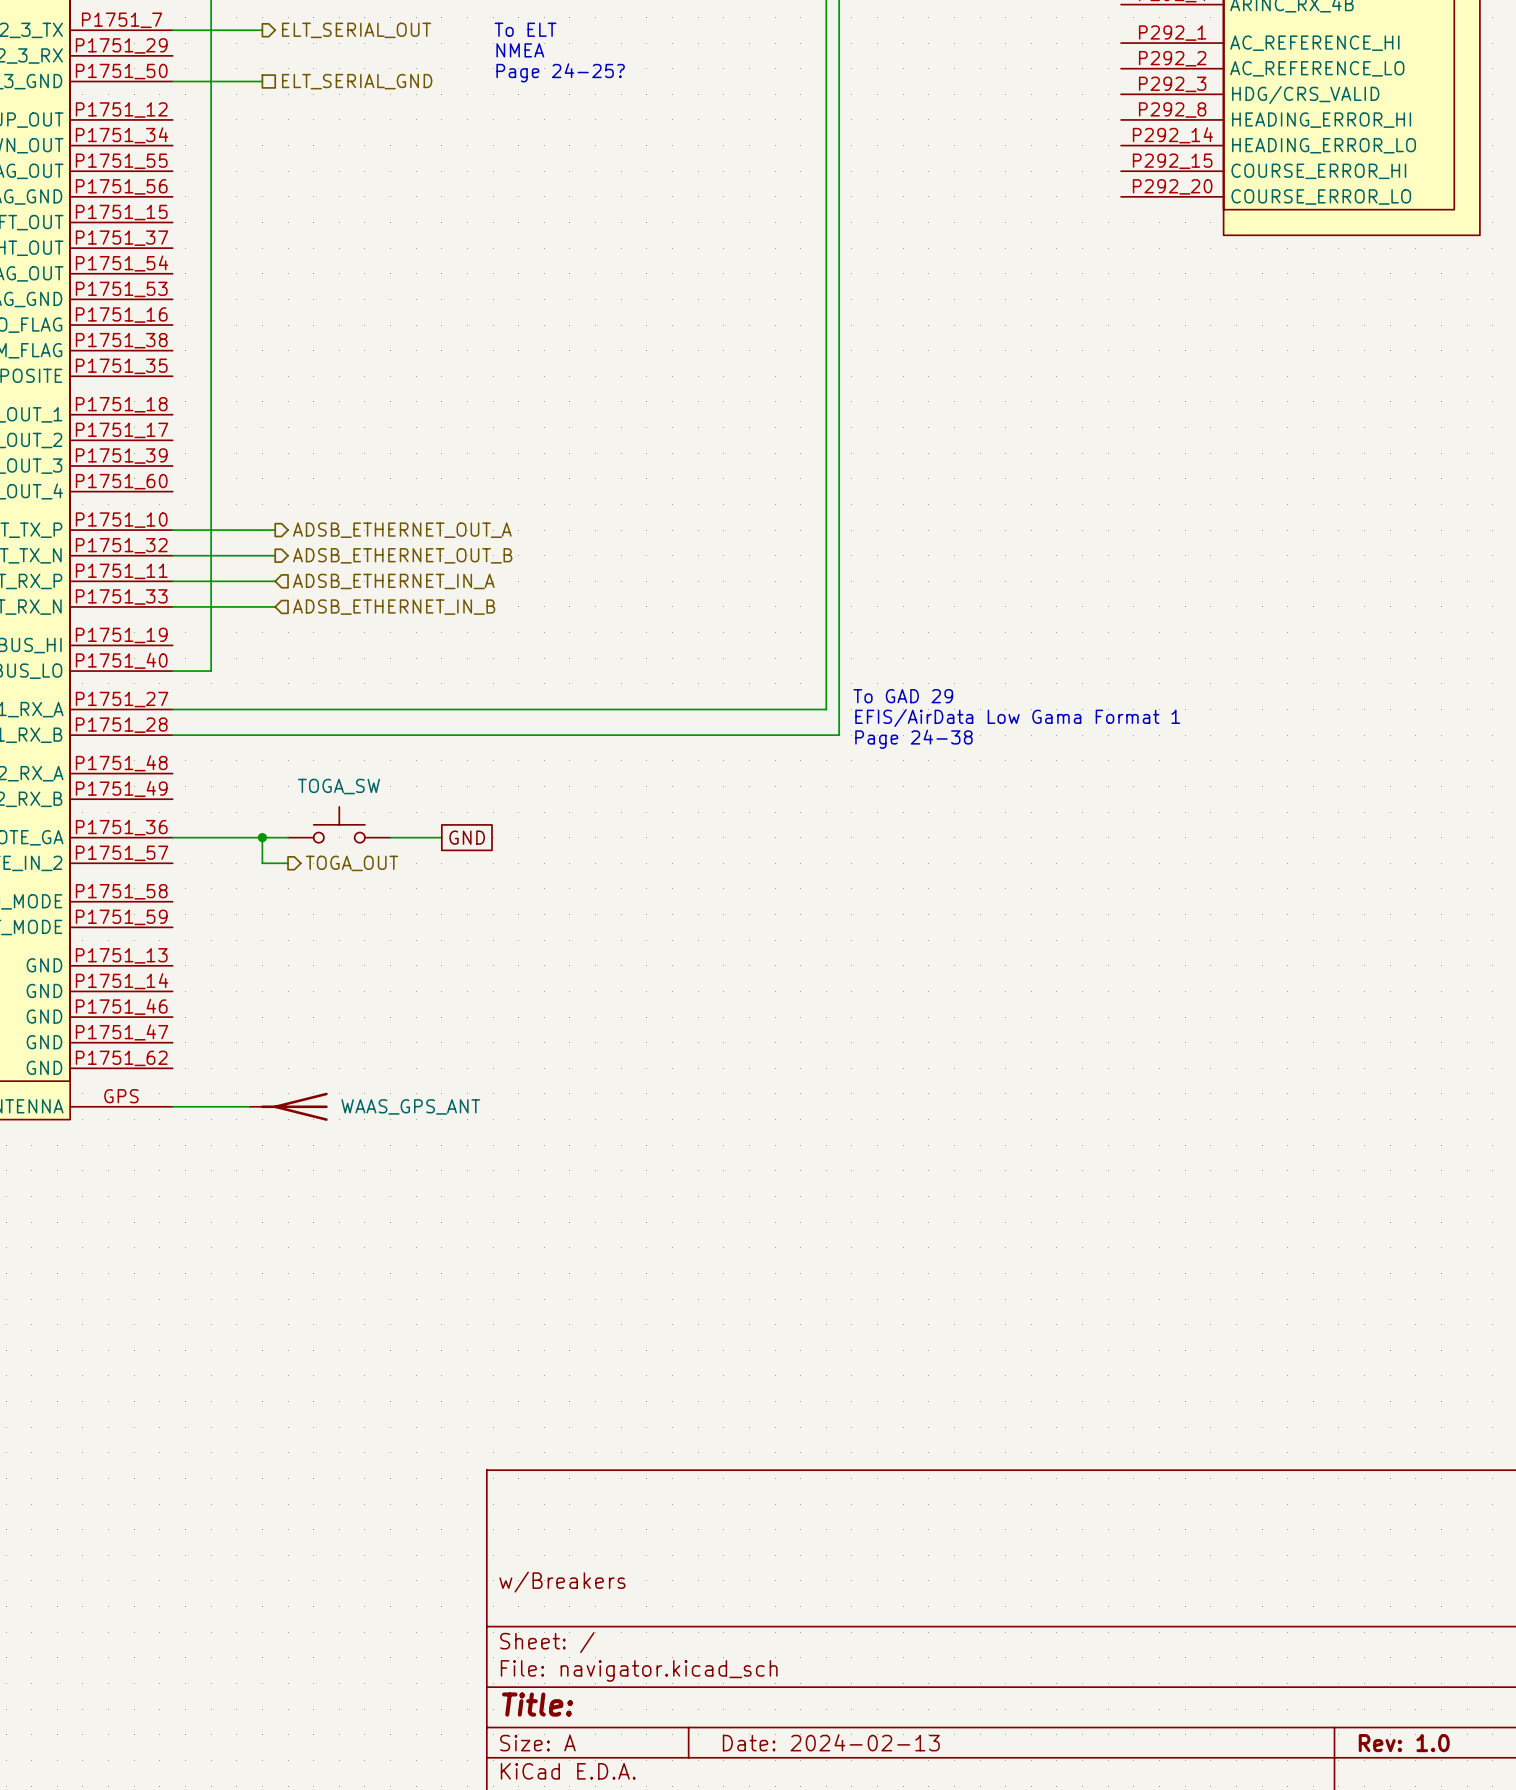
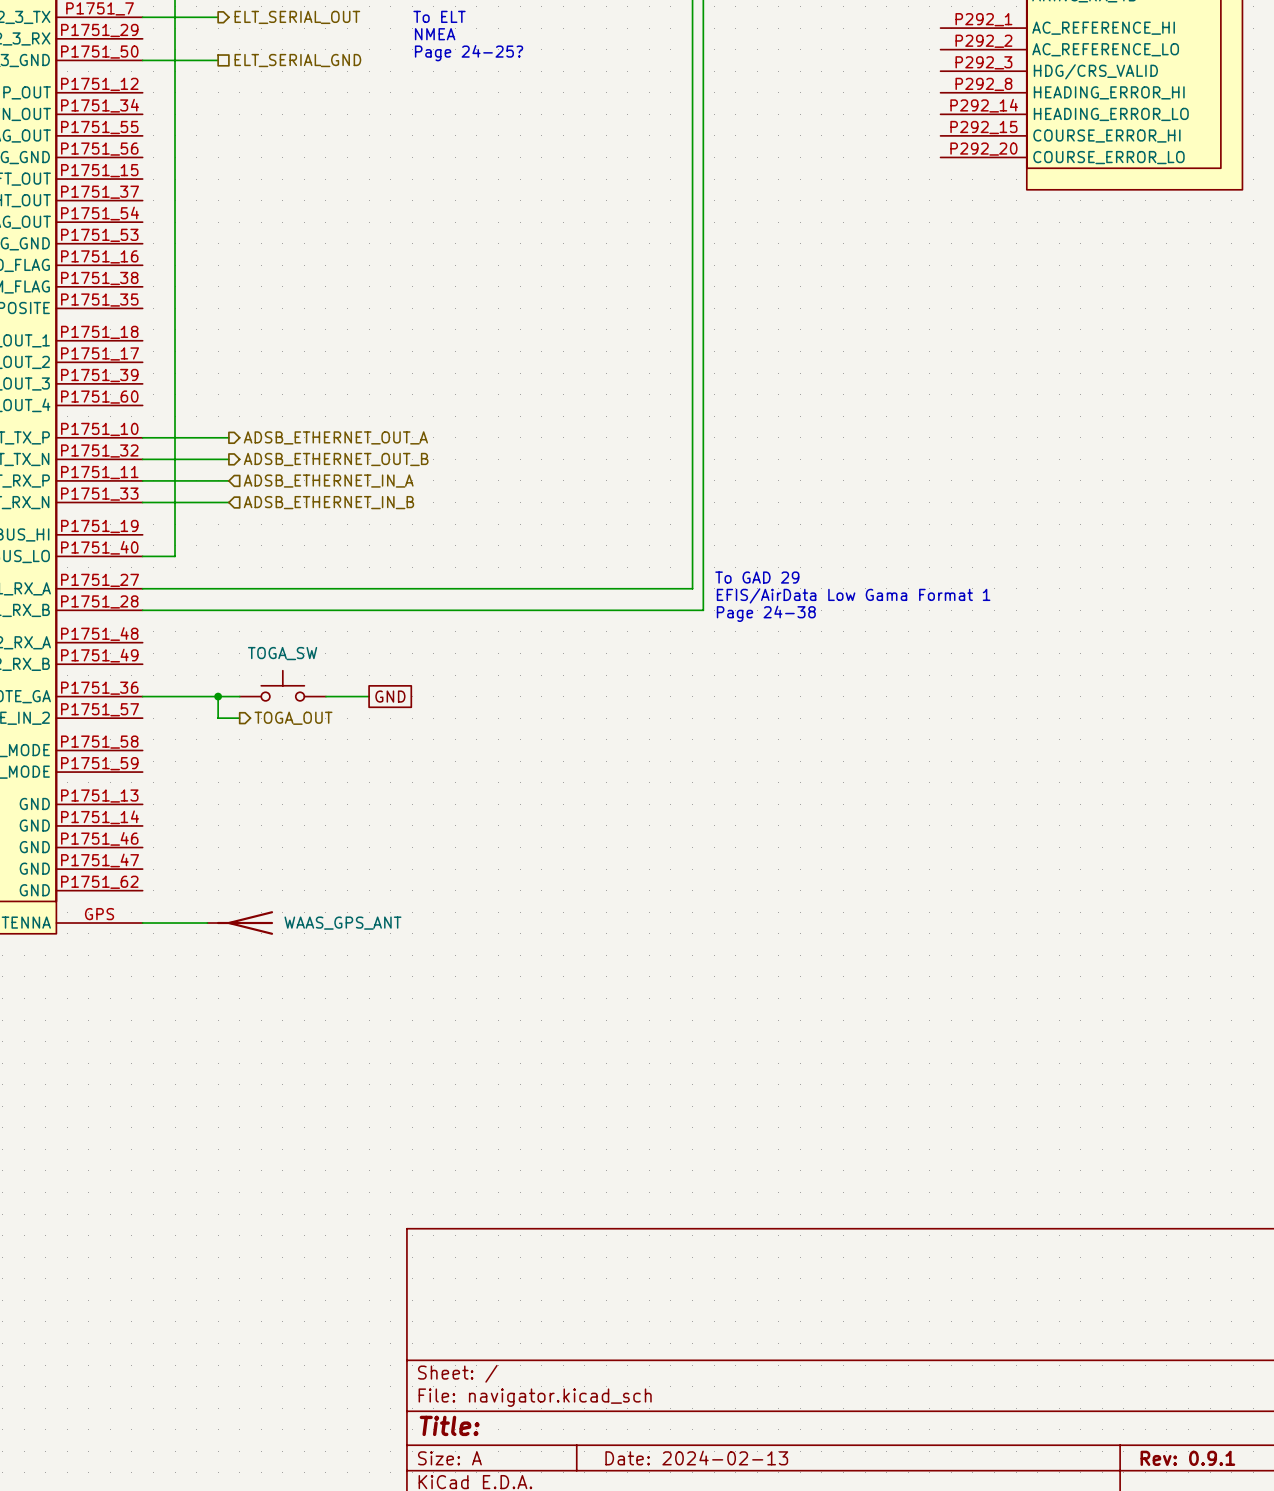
title block: w/Breakers (562, 1582) -> none
title block: Rev: 1.0 (1404, 1743) -> Rev: 0.9.1 (1187, 1458)

